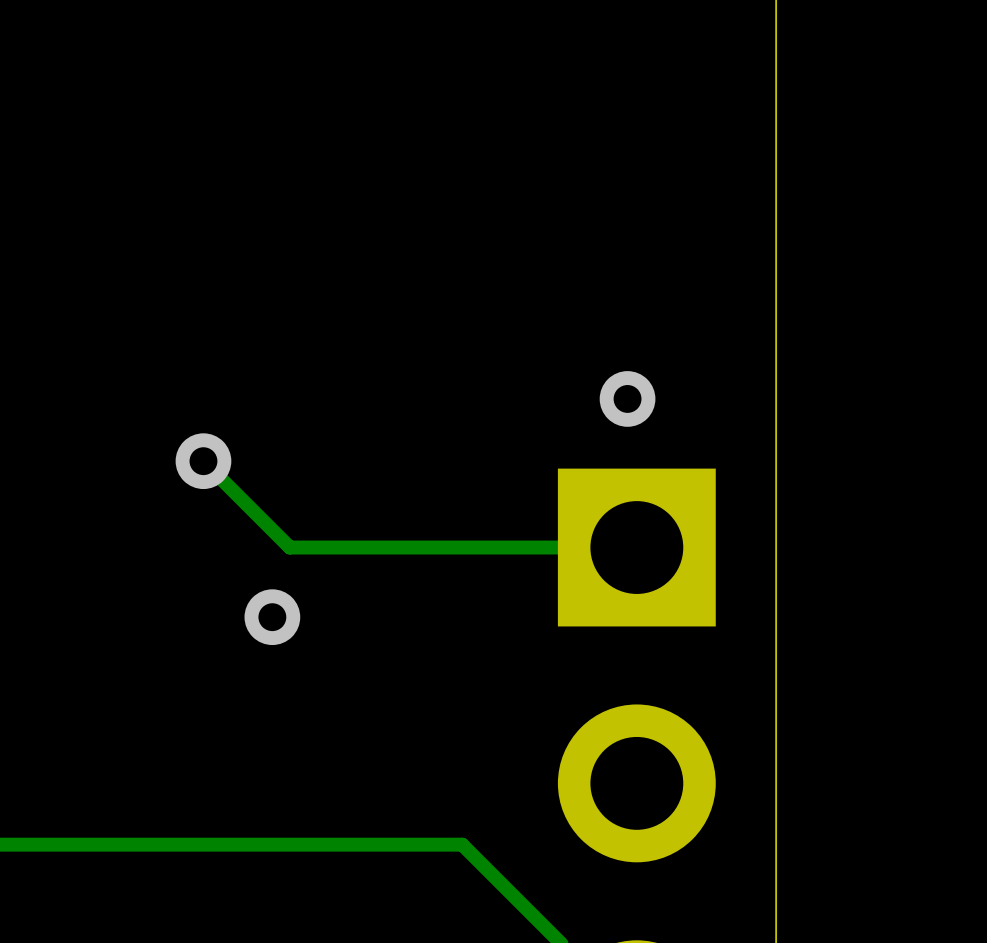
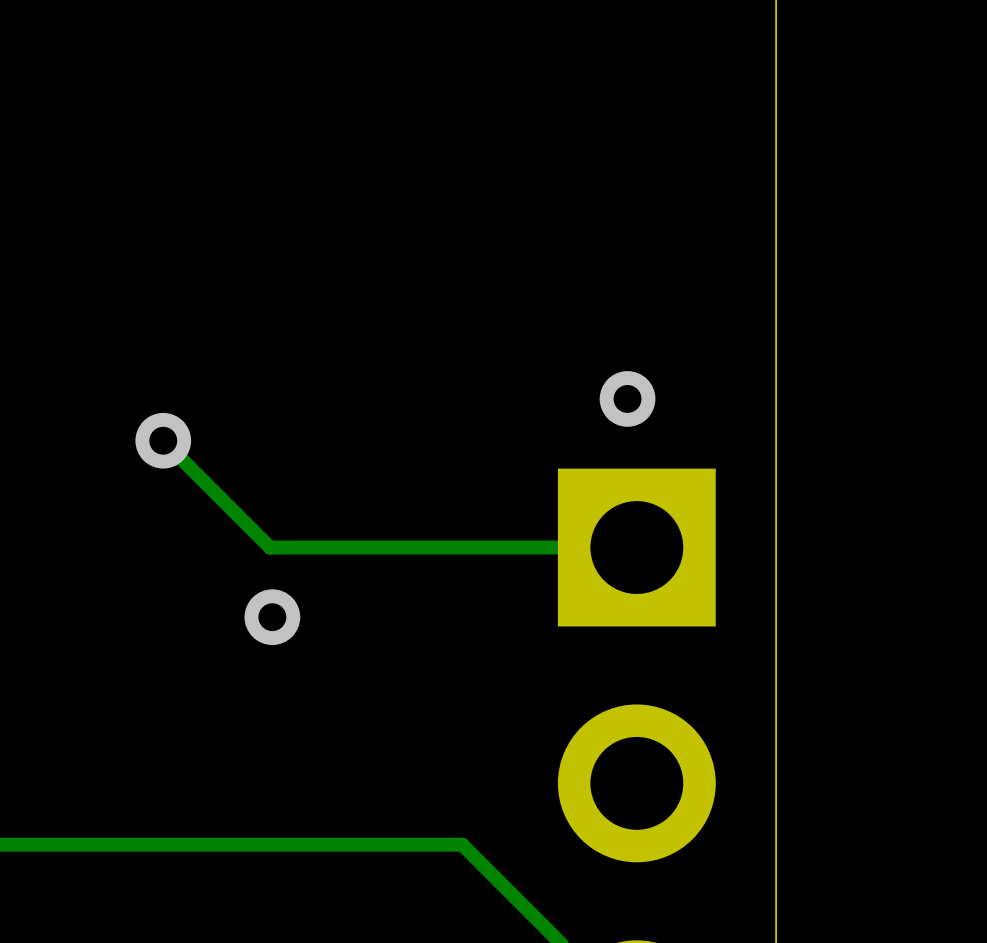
track: (203, 461) (289, 547) -> (163, 440) (270, 547) (289, 547)
via position: (203, 461) -> (163, 440)

